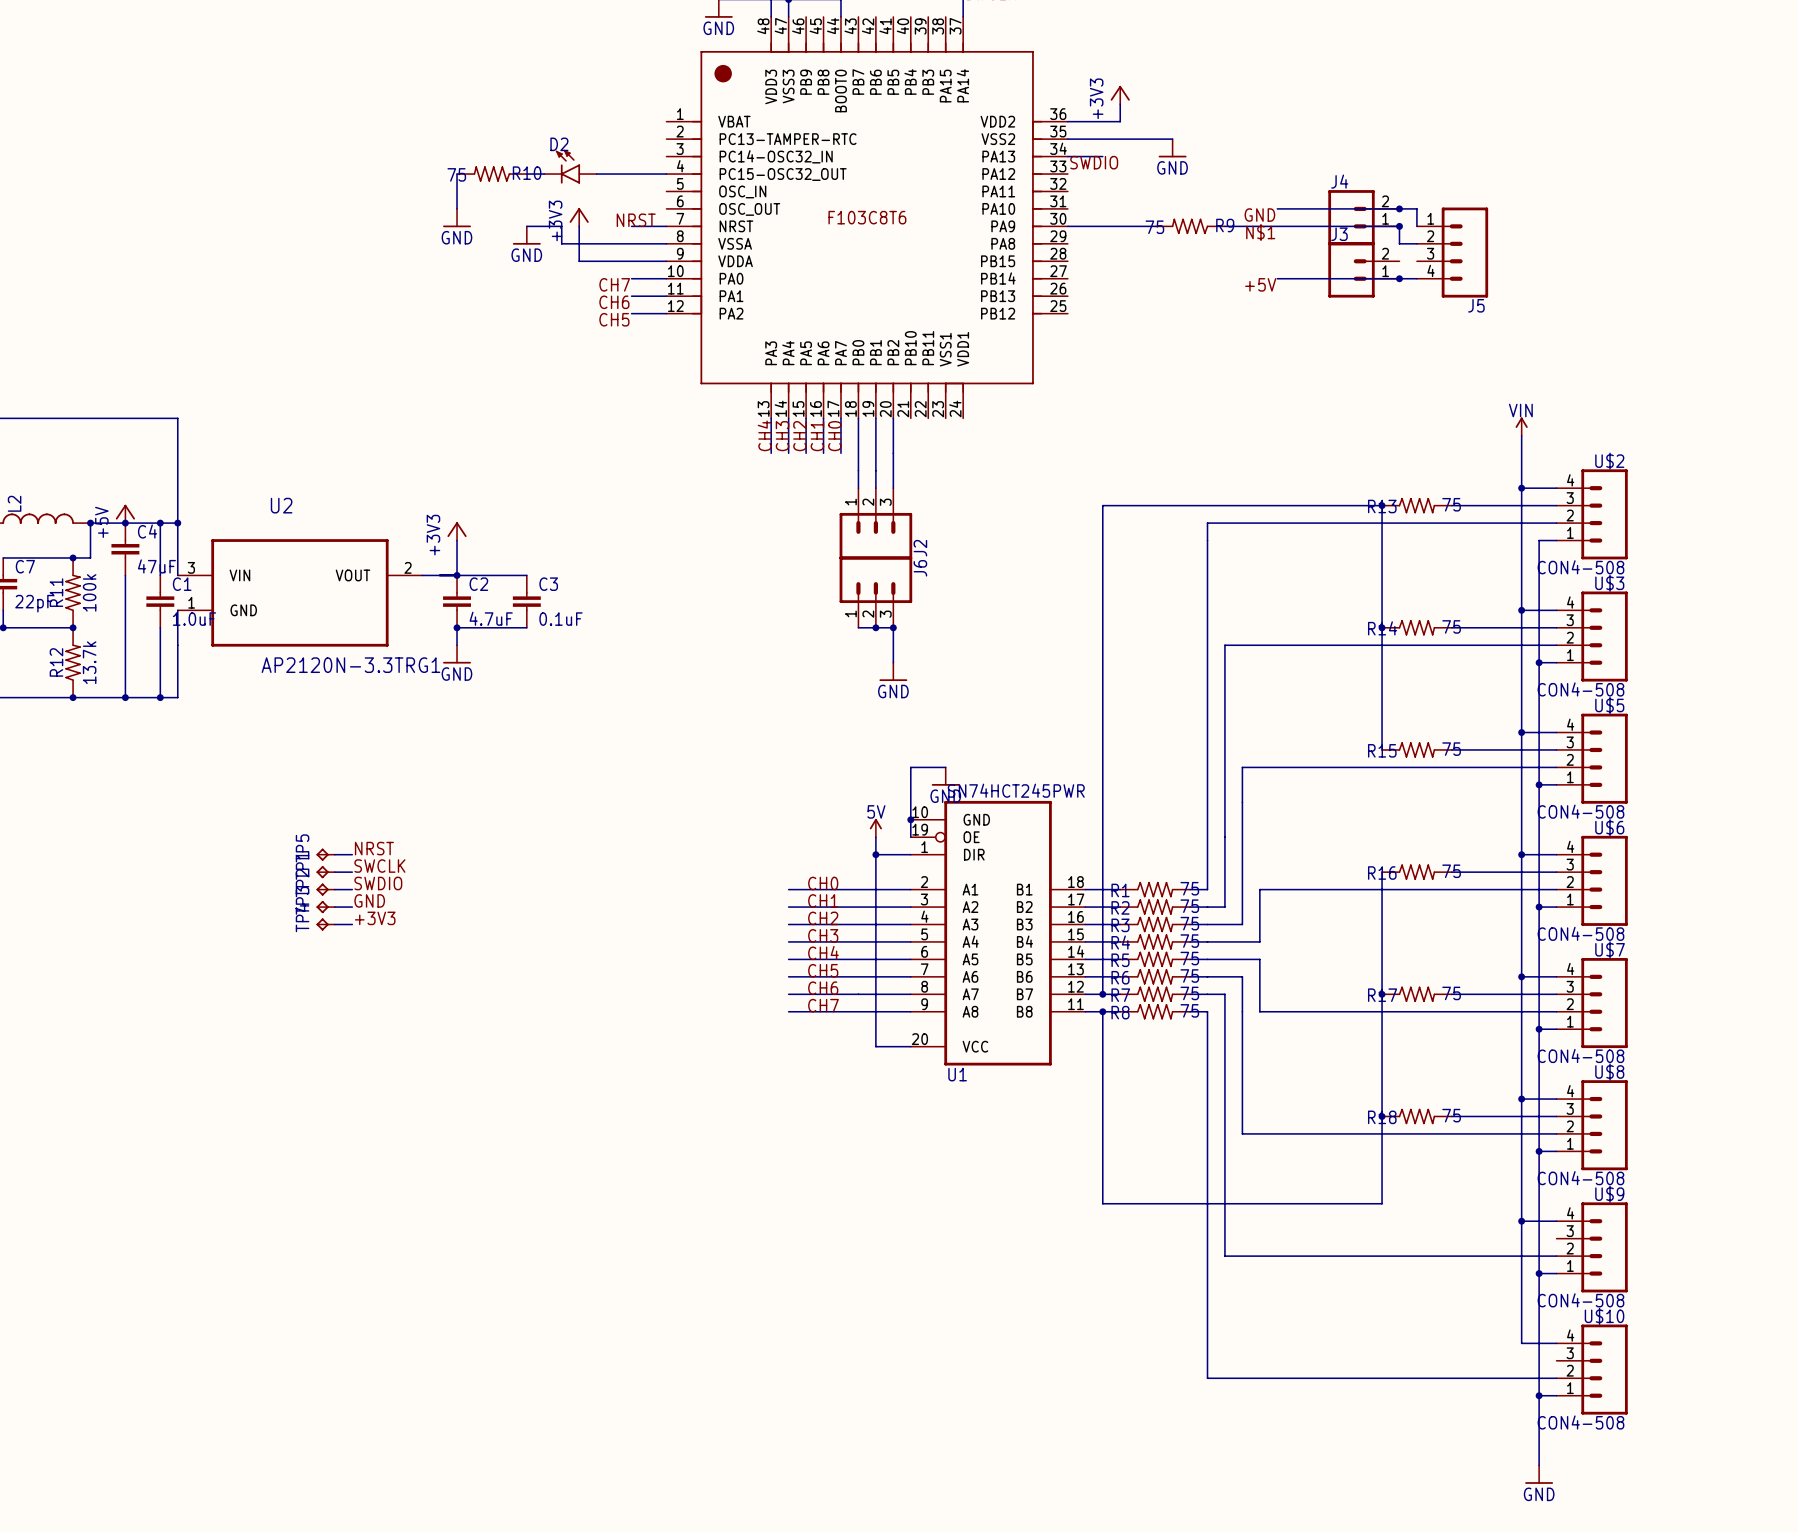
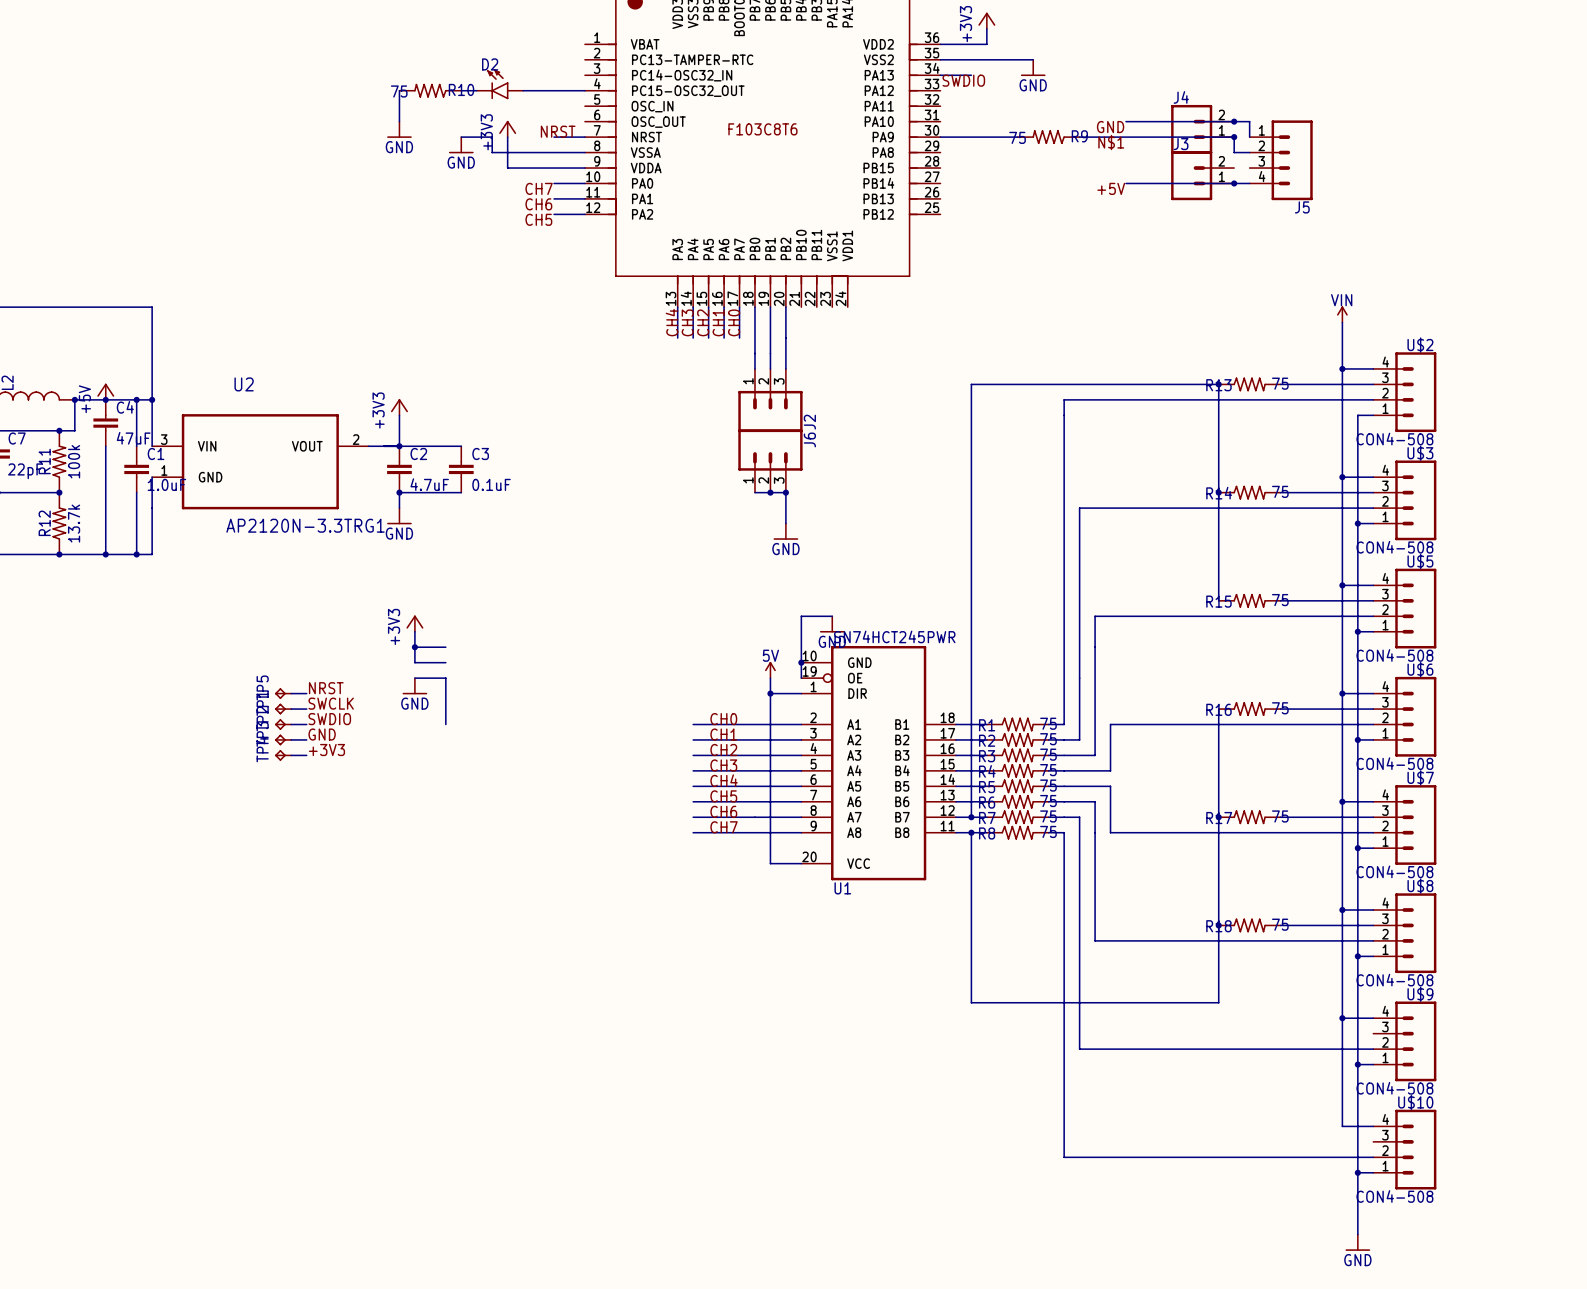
power symbol: none -> +3V3 (414, 623)
wire: none -> (414, 631) (414, 662) (445, 662)
wire: none -> (414, 647) (445, 647)
junction: none -> (414, 647)
wire: none -> (414, 678) (445, 678) (445, 724)
power symbol: none -> GND (414, 686)

